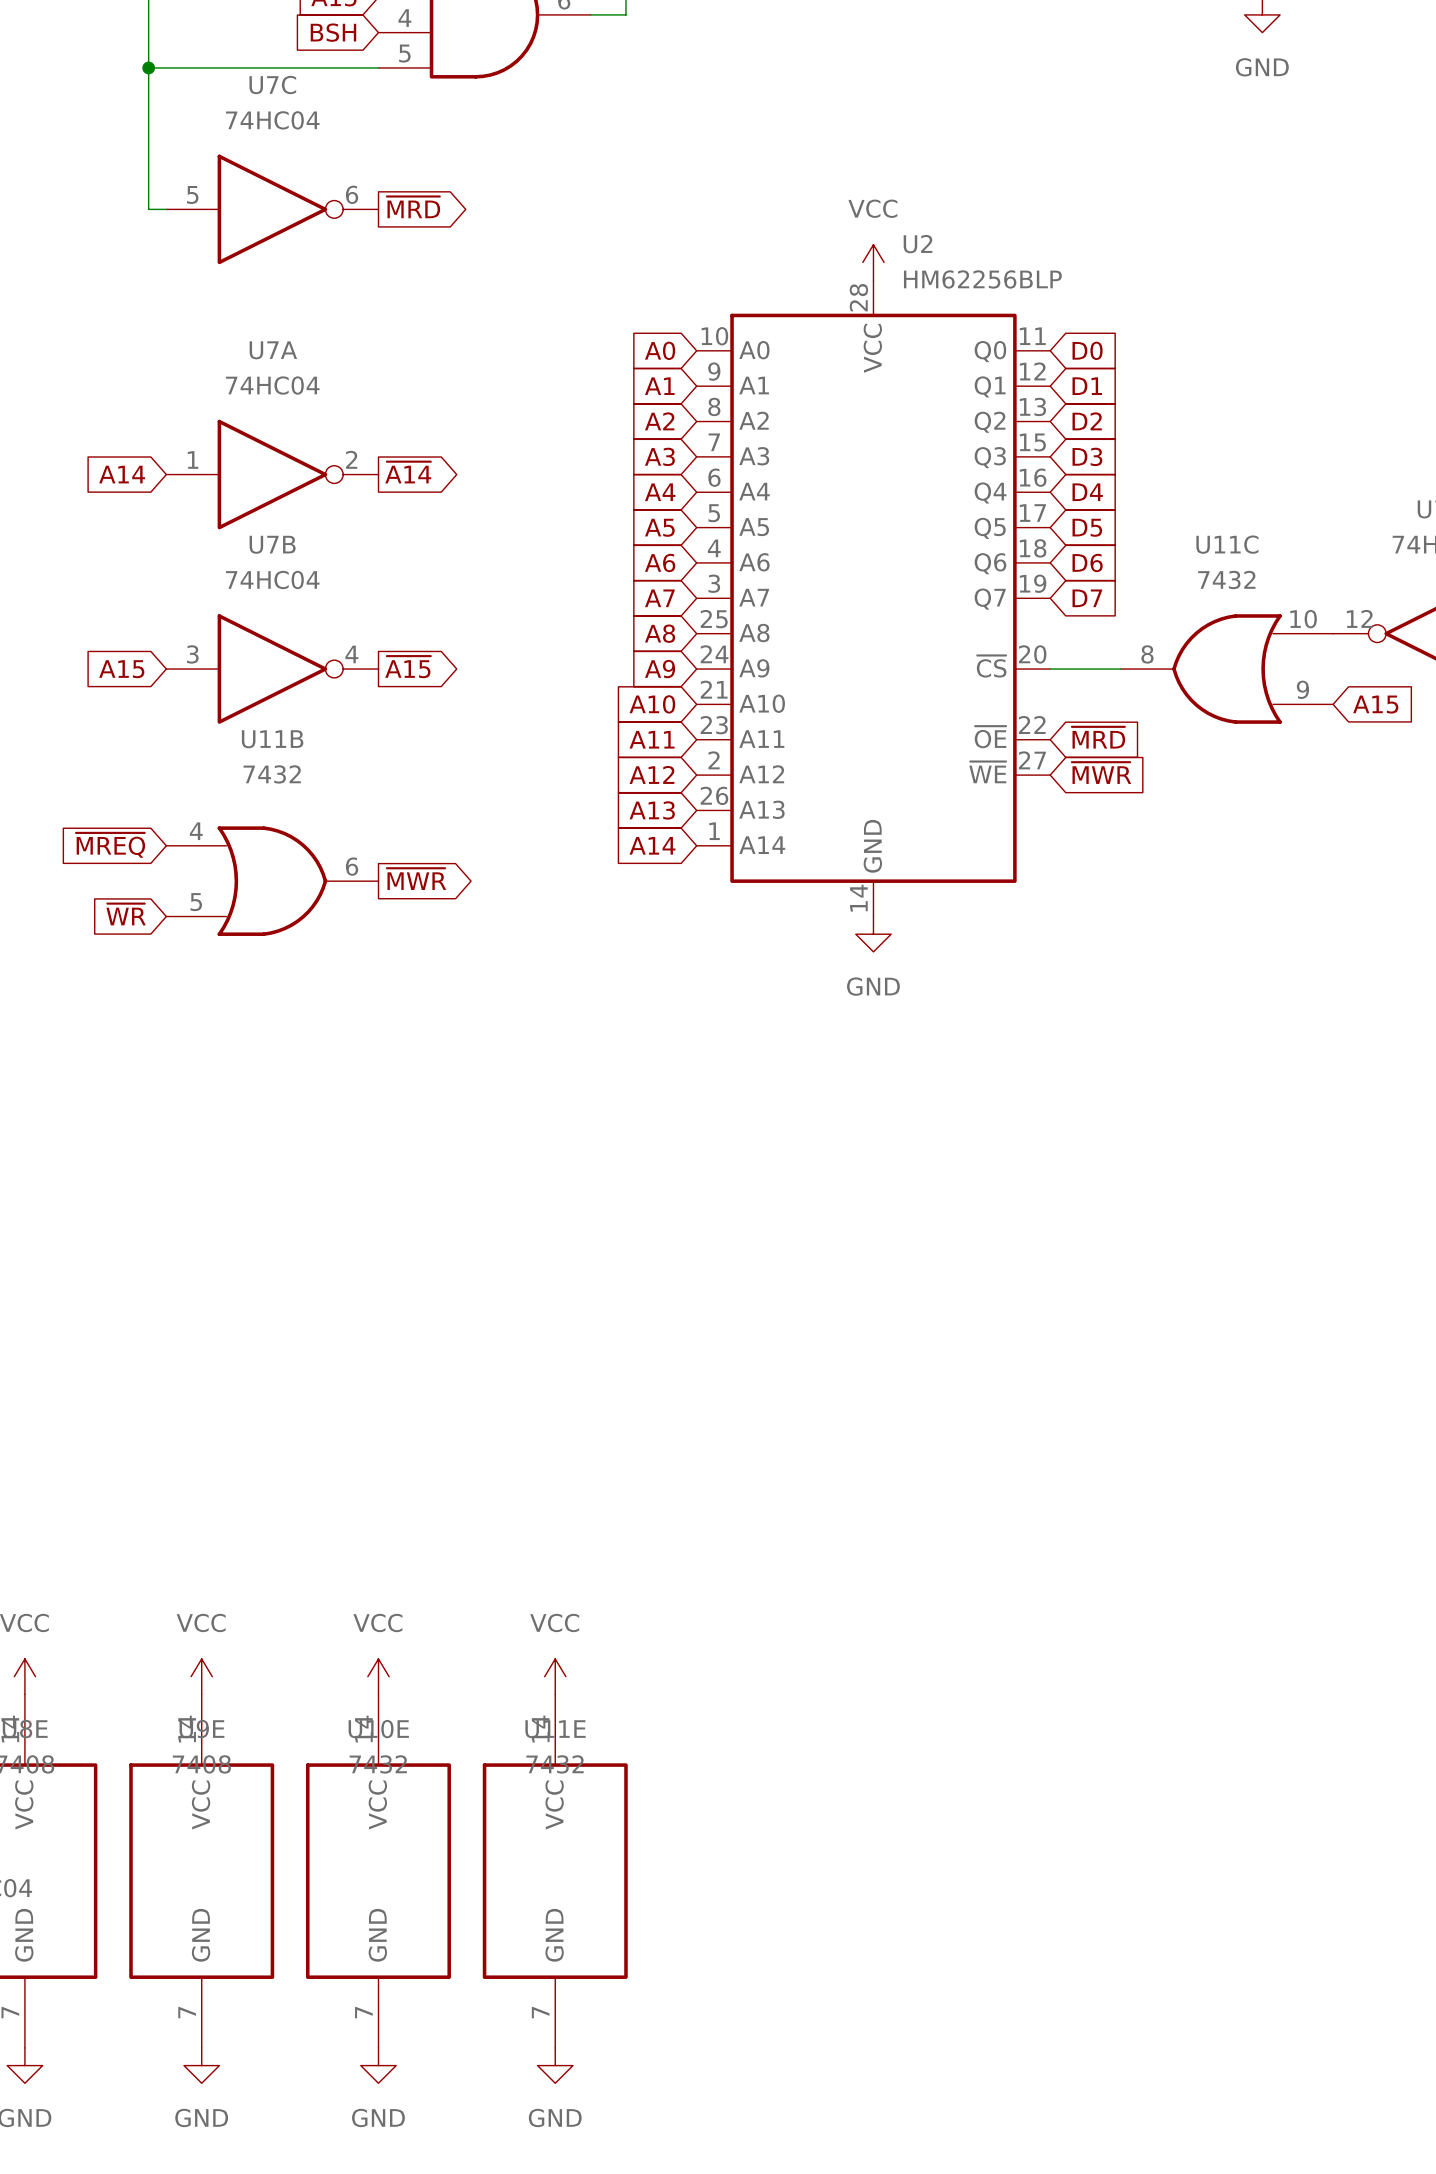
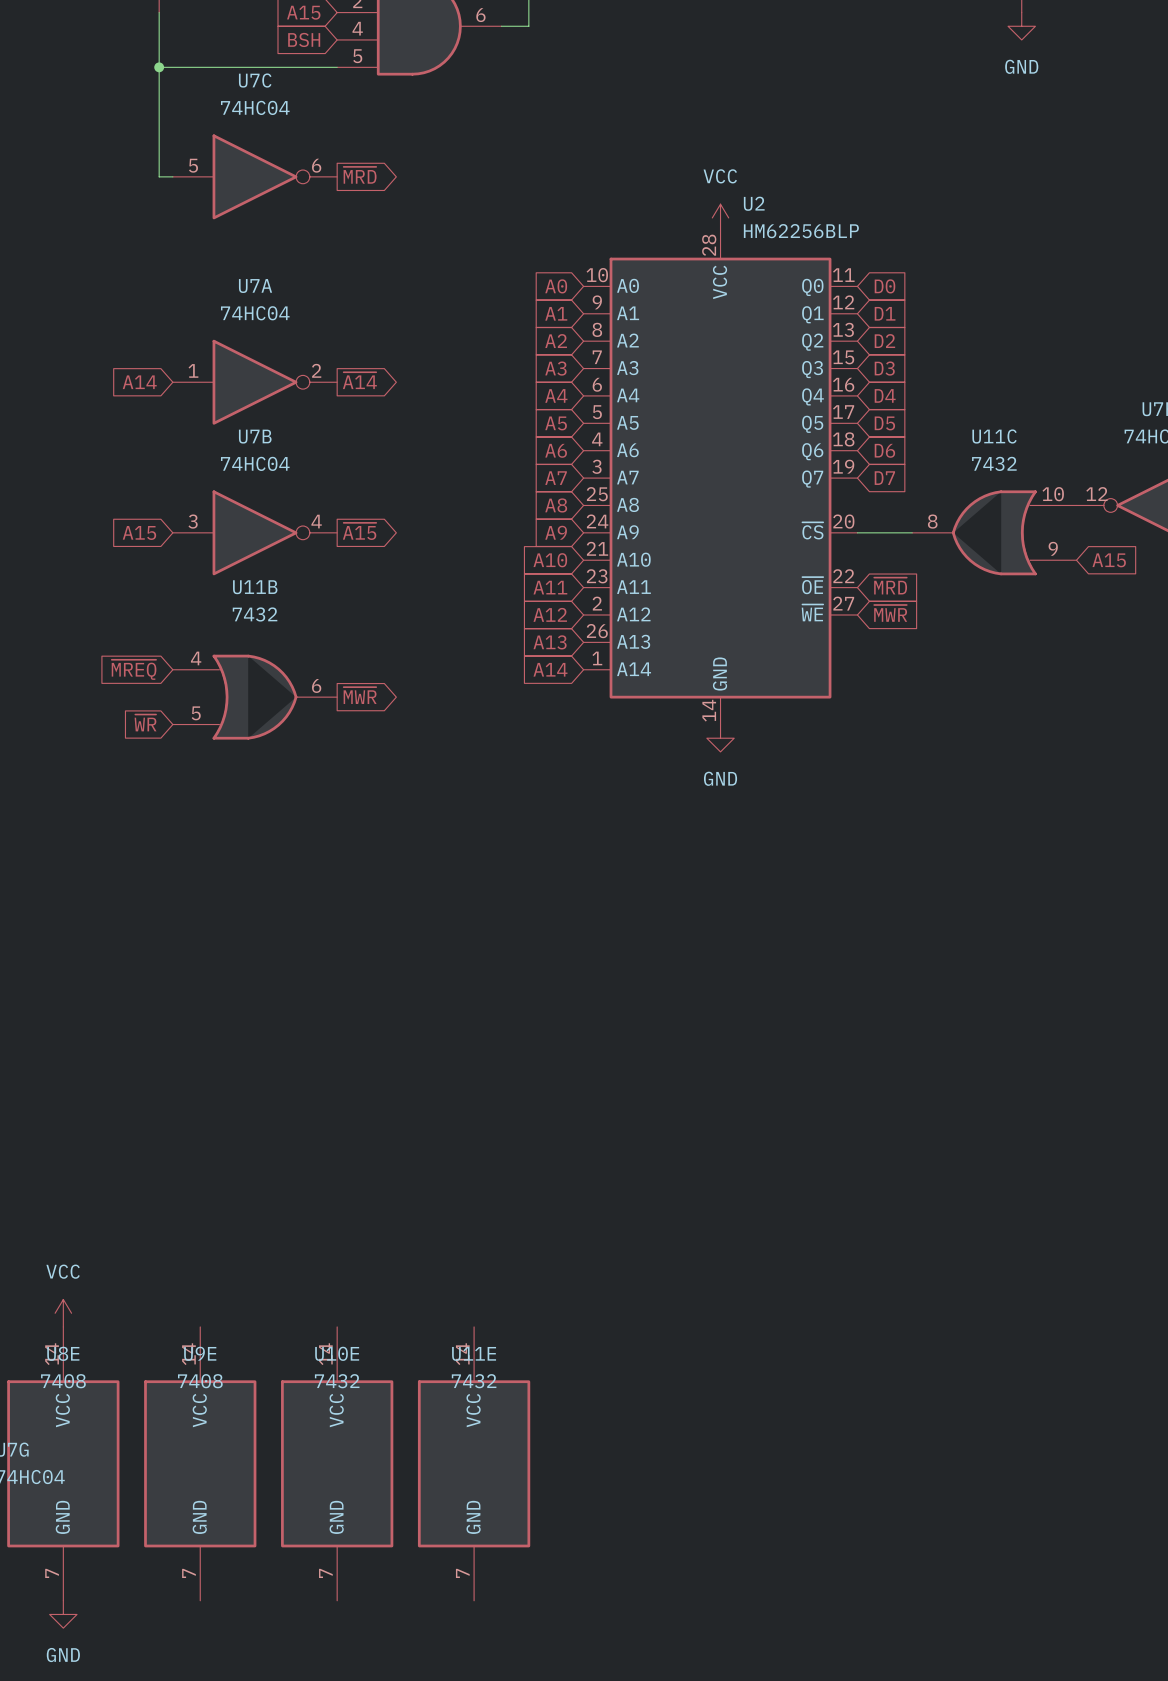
power symbol: VCC (201, 1676) -> none
power symbol: VCC (378, 1676) -> none
power symbol: VCC (555, 1676) -> none
power symbol: GND (201, 2065) -> none
power symbol: GND (378, 2065) -> none
power symbol: GND (555, 2065) -> none

